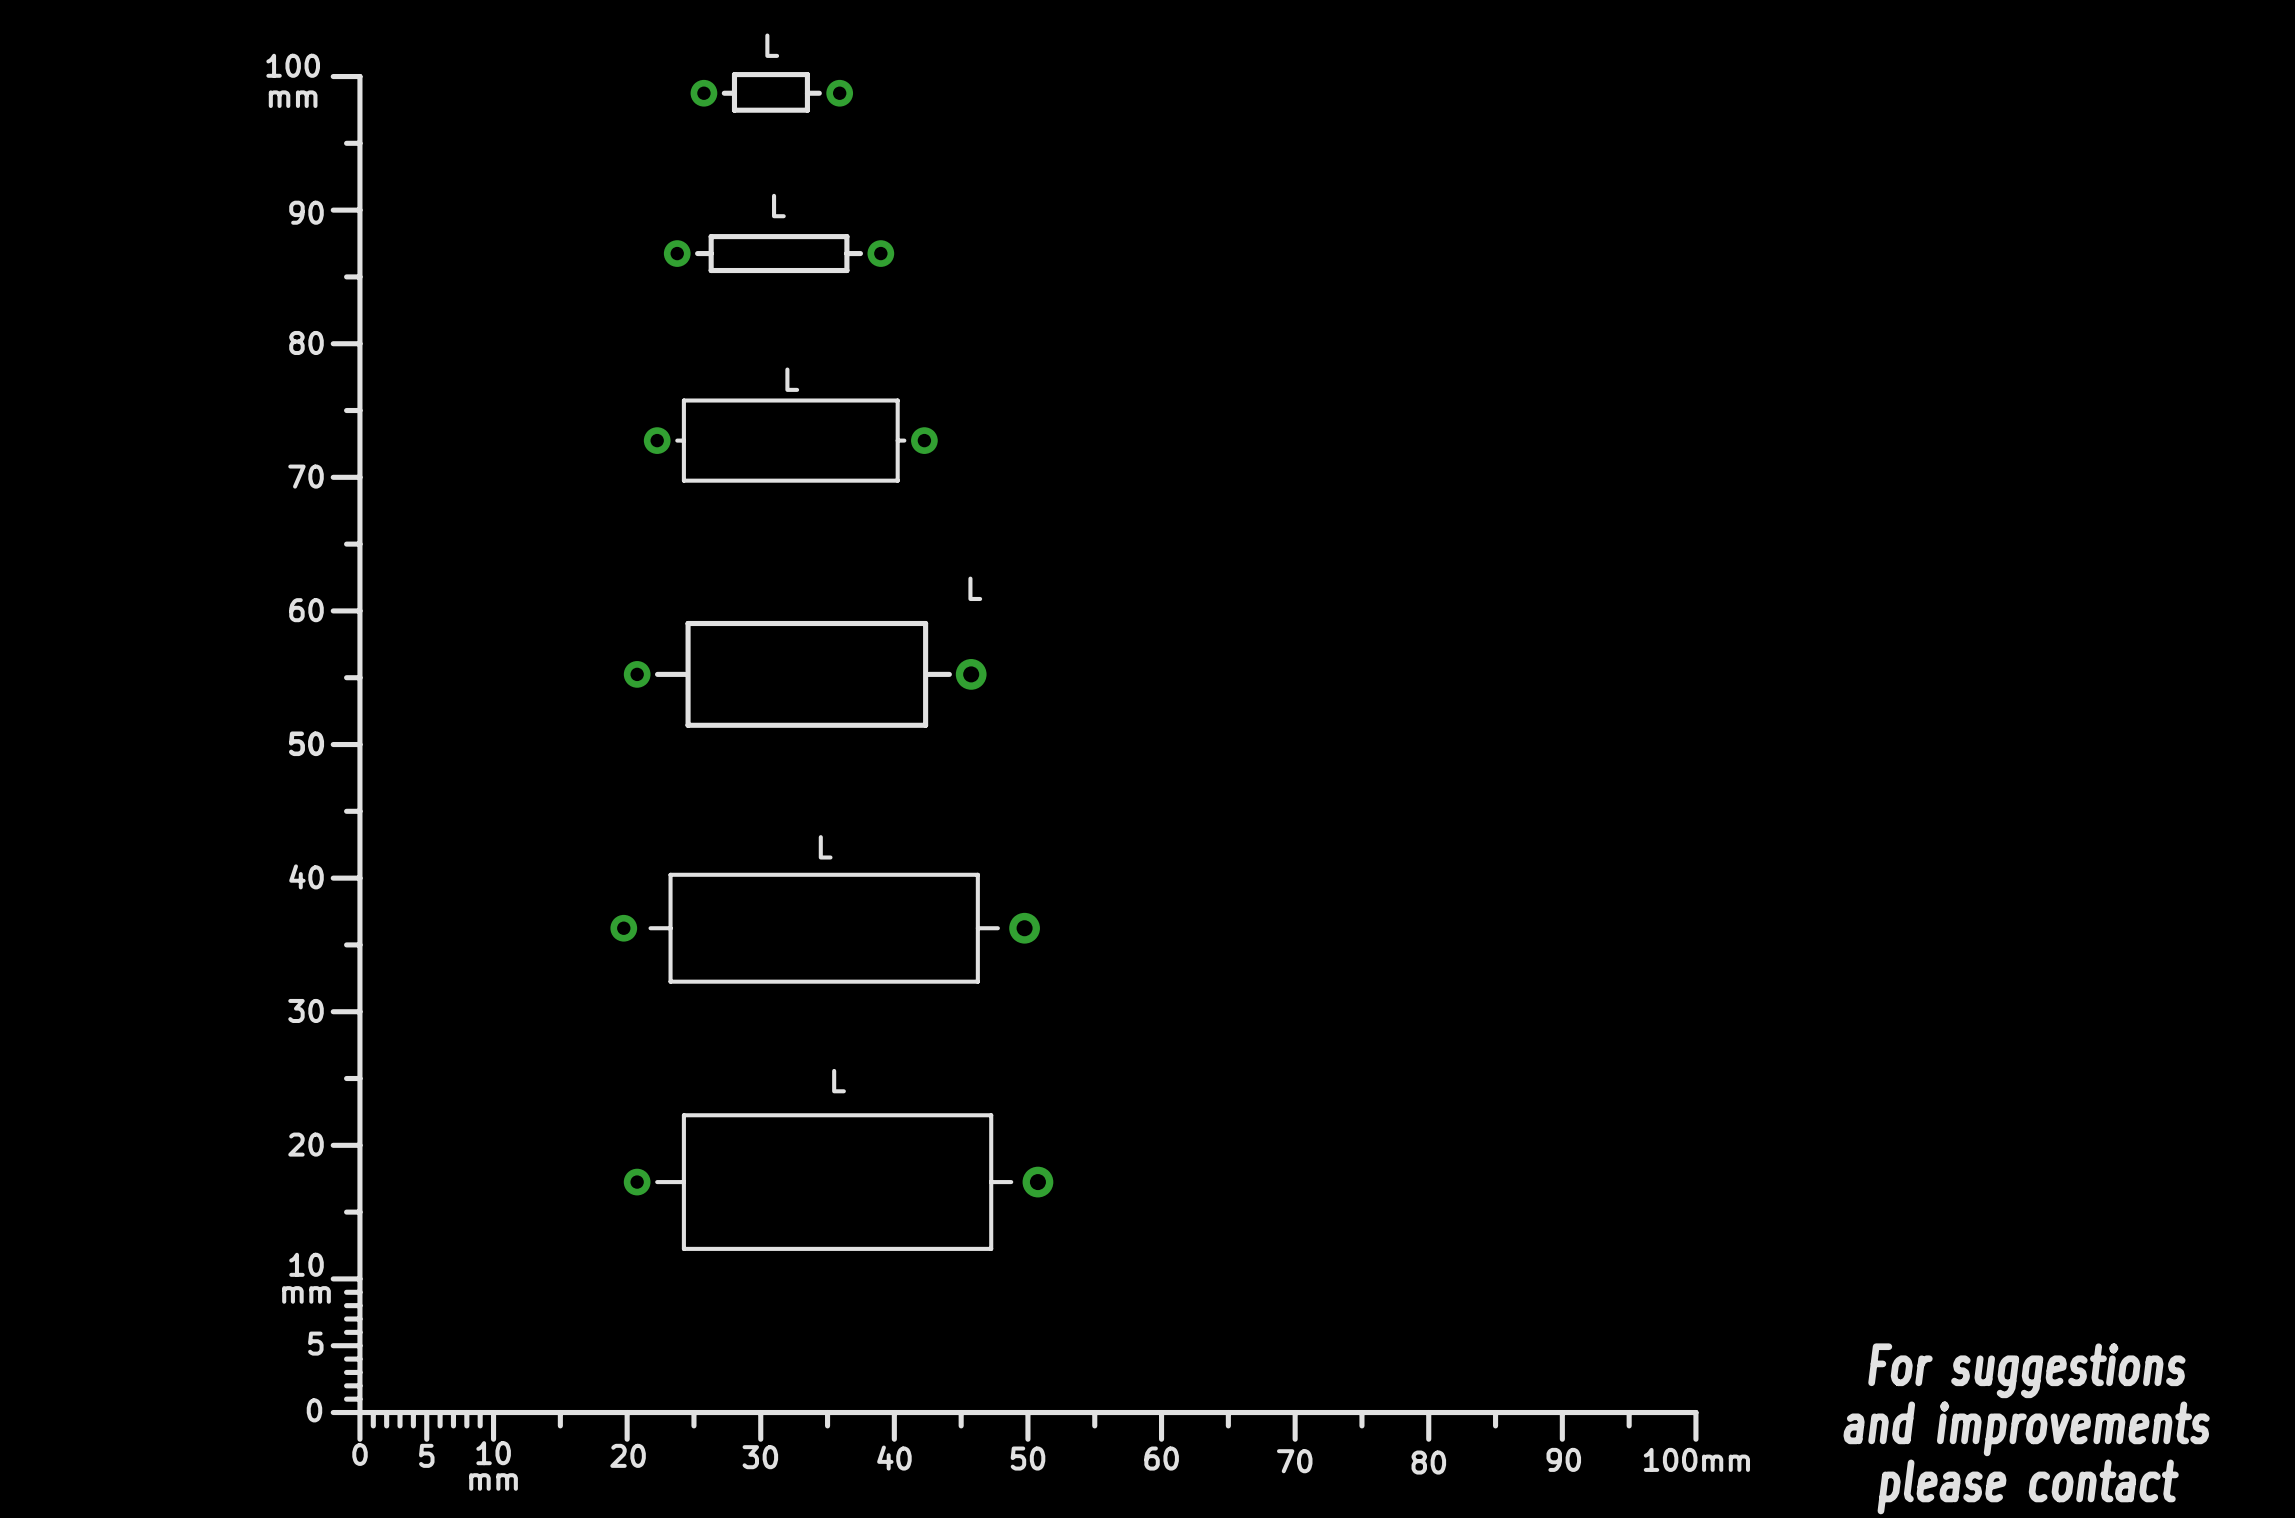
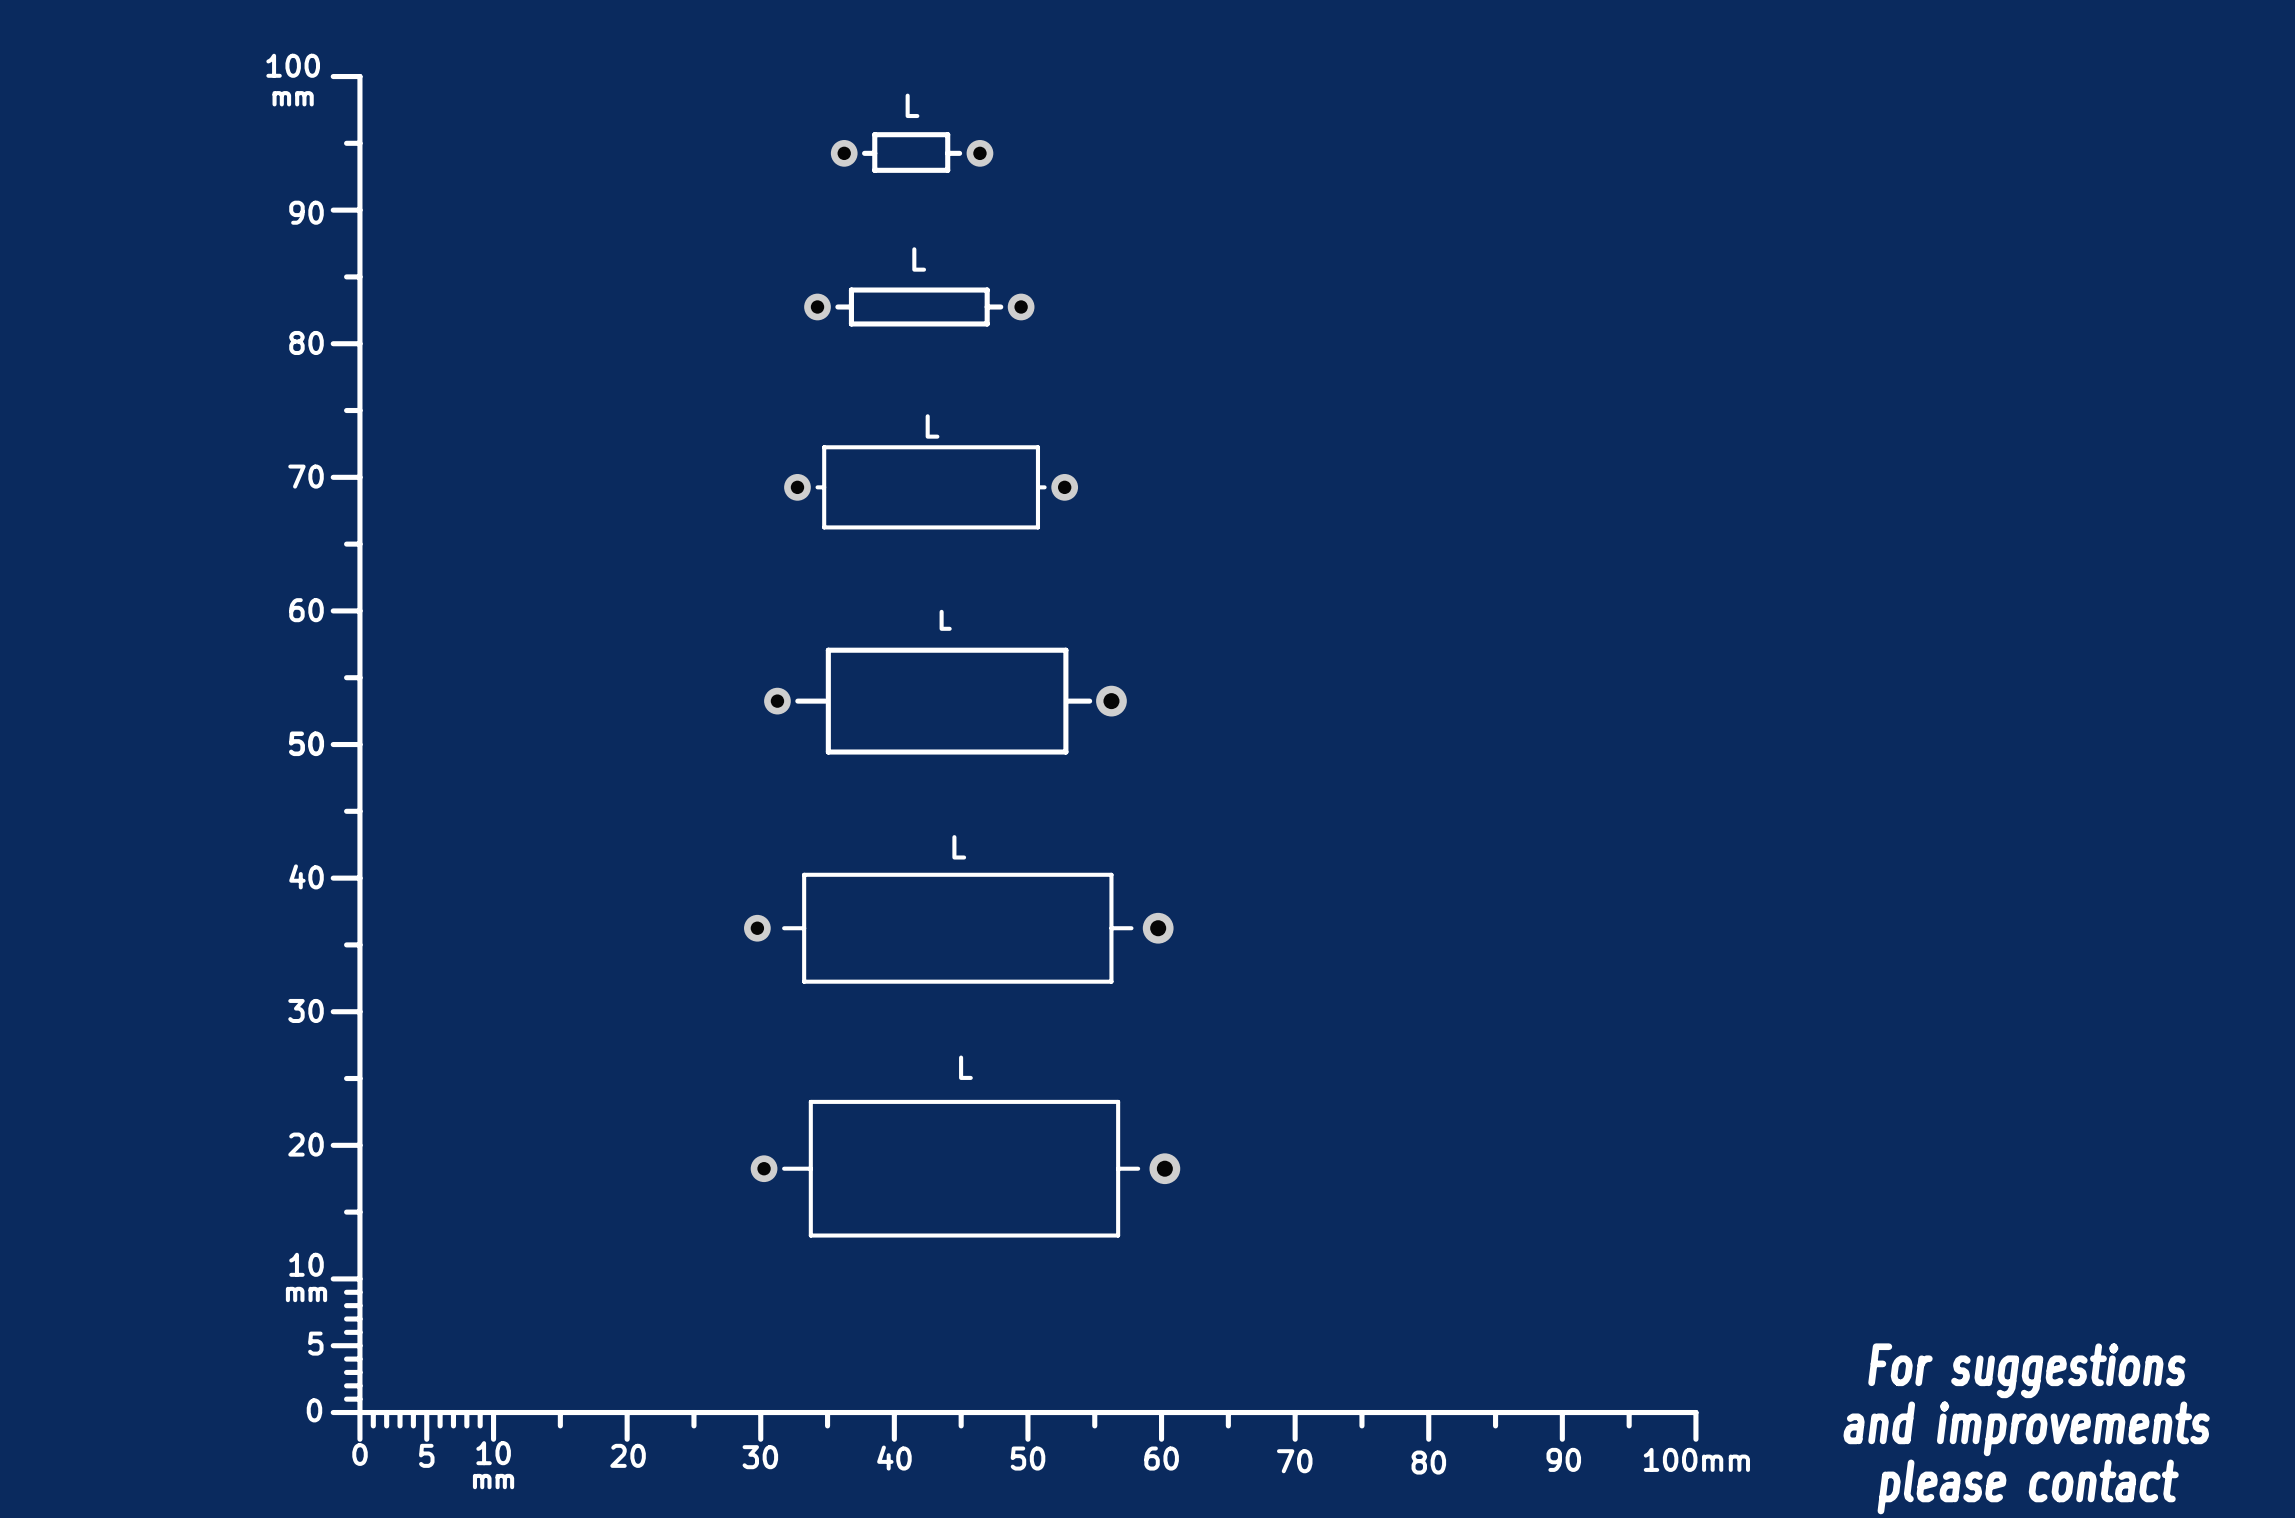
drawing shape: [266, 53, 1750, 1491] -> [266, 53, 1750, 1490]
L position: (771, 92) -> (912, 152)
L position: (779, 253) -> (919, 306)
L position: (790, 440) -> (931, 487)
L name position: L (975, 588) -> L (945, 620)
L position: (805, 674) -> (945, 701)
L position: (825, 928) -> (958, 928)
L position: (838, 1182) -> (965, 1168)

